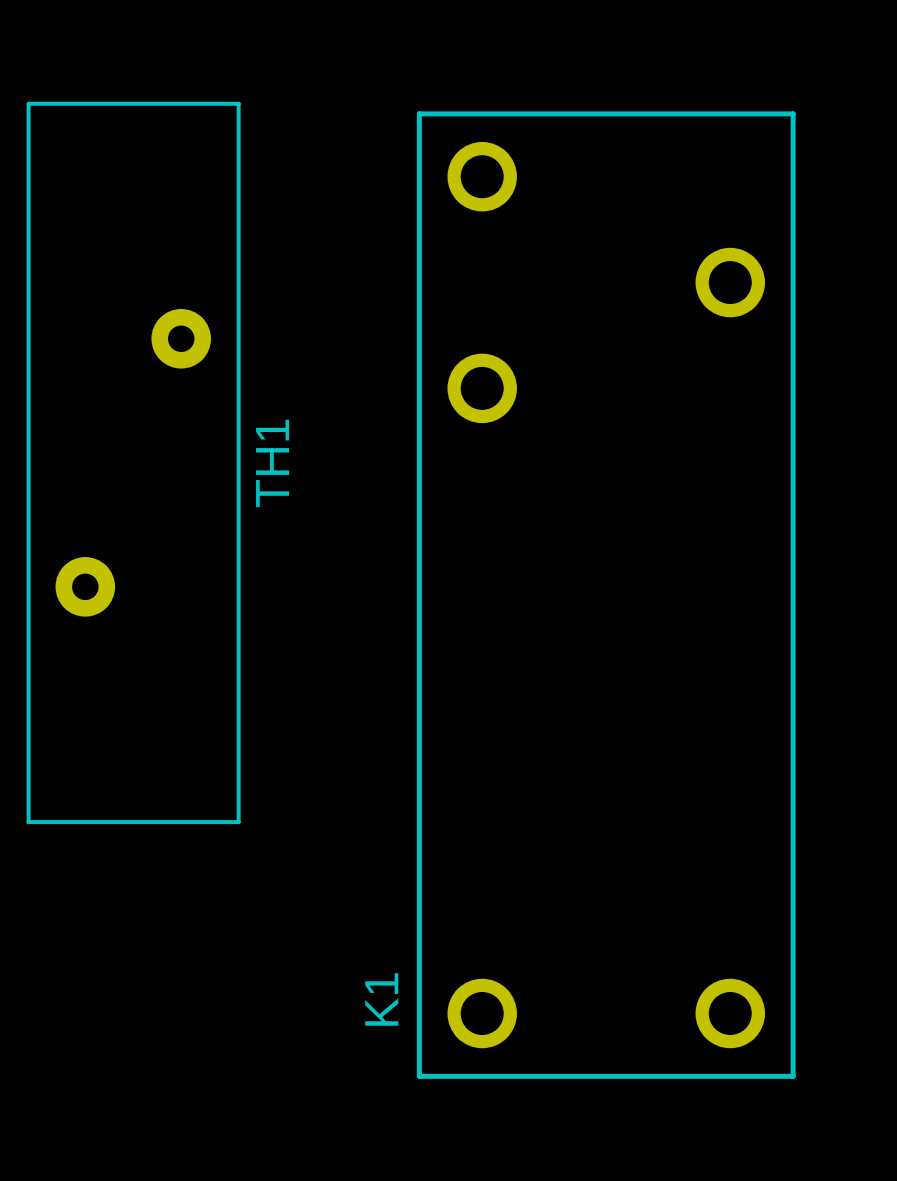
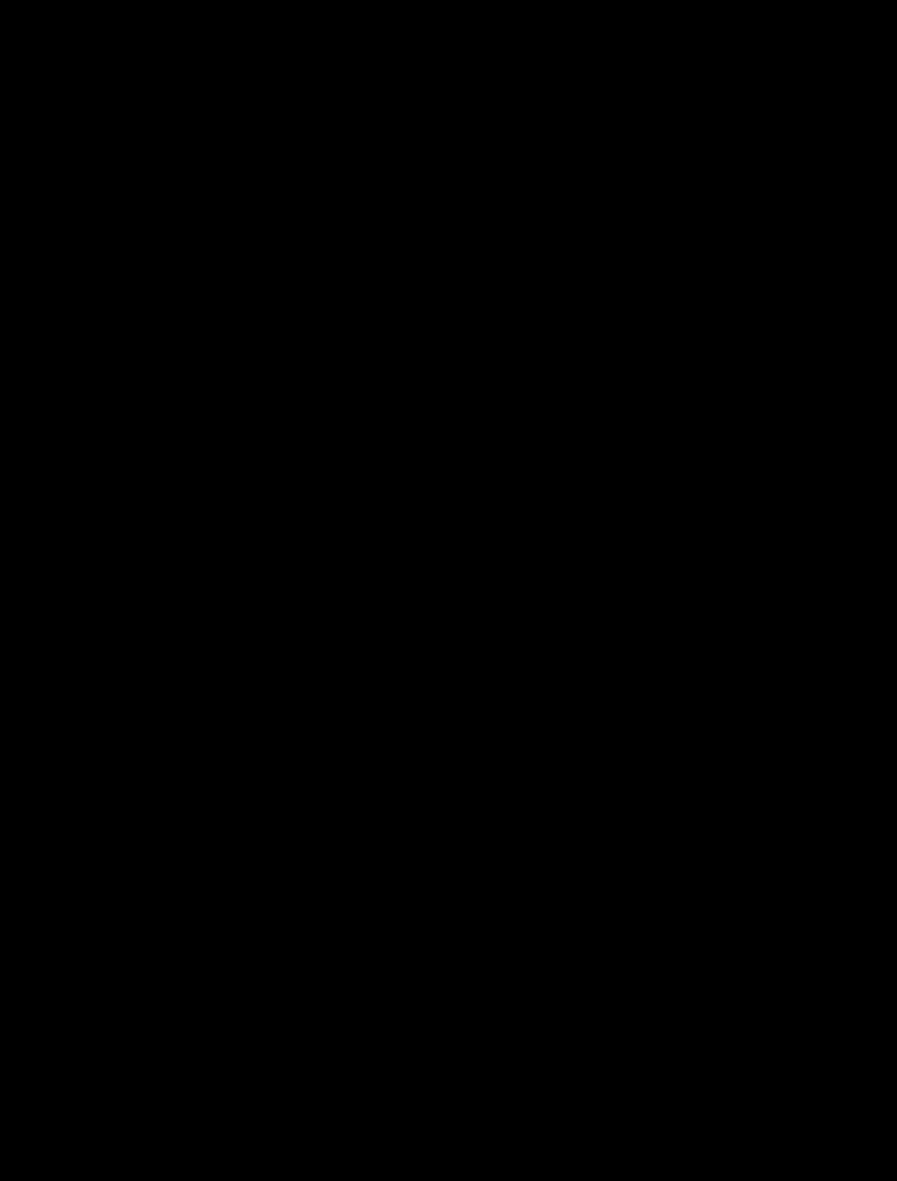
TH1: (133, 462) -> none
K1: (606, 595) -> none

